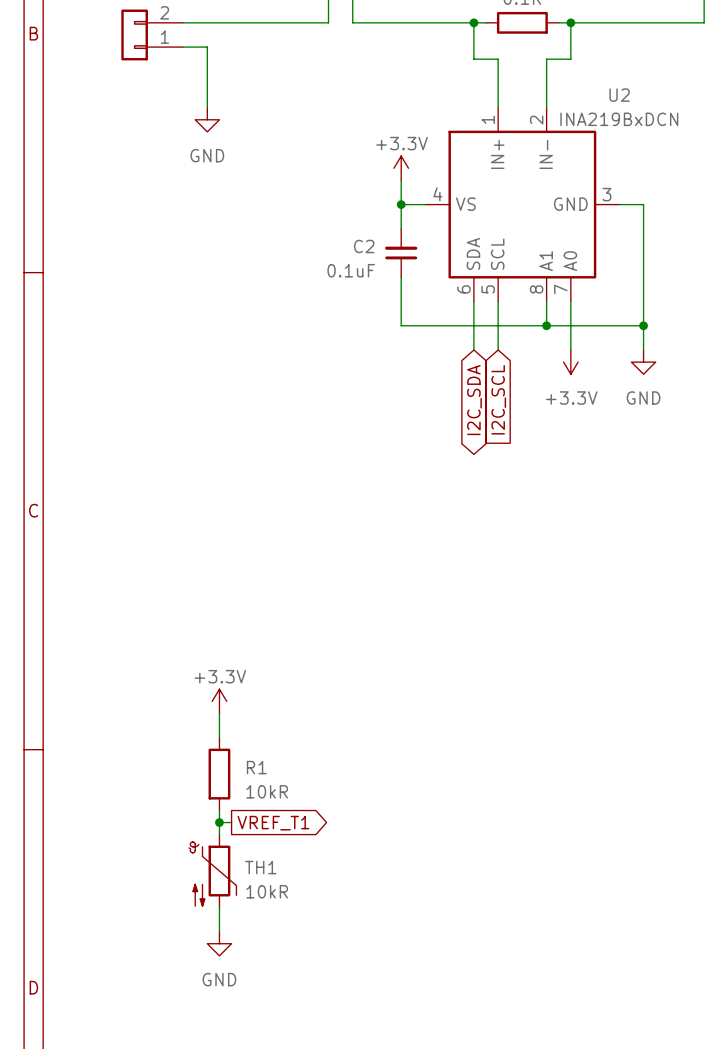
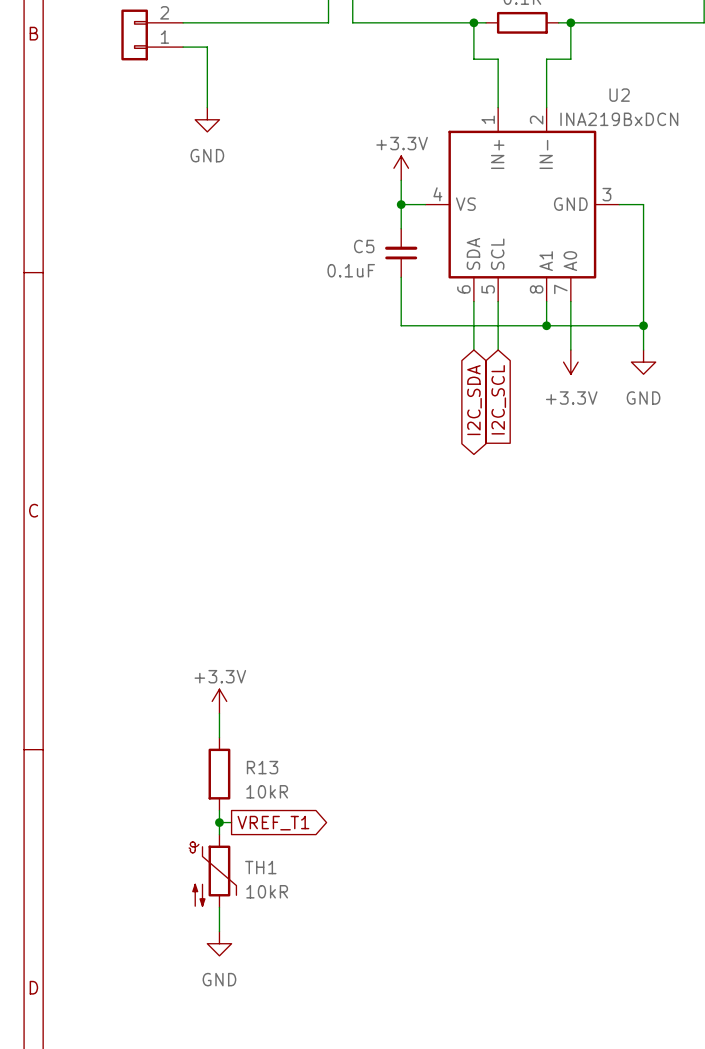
C2 name: C2 (364, 246) -> C5 (364, 246)
R1 name: R1 (256, 767) -> R13 (262, 767)

